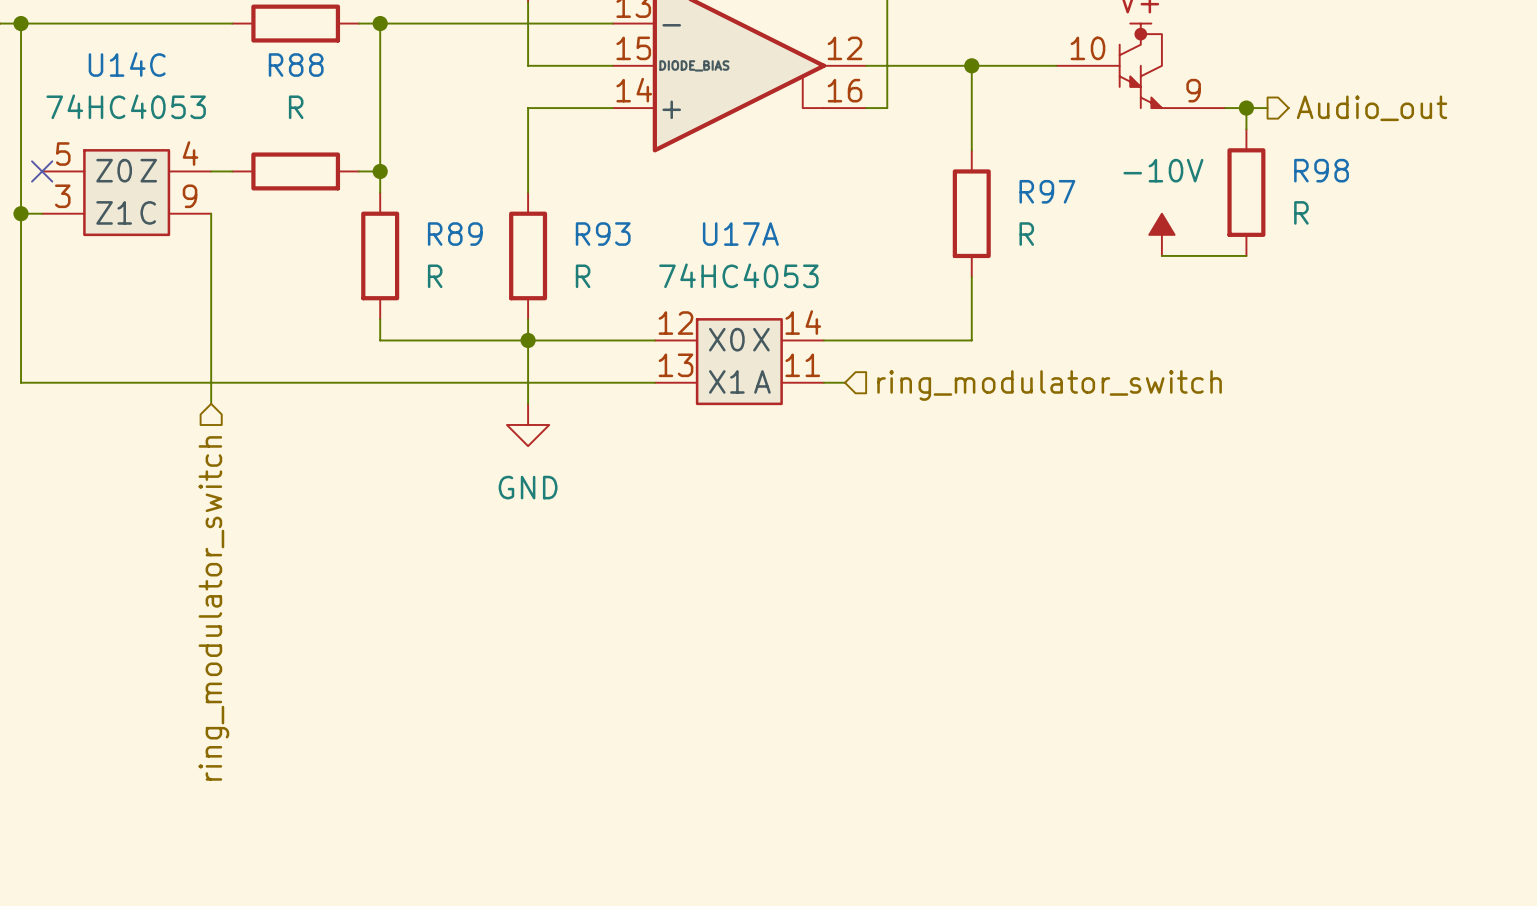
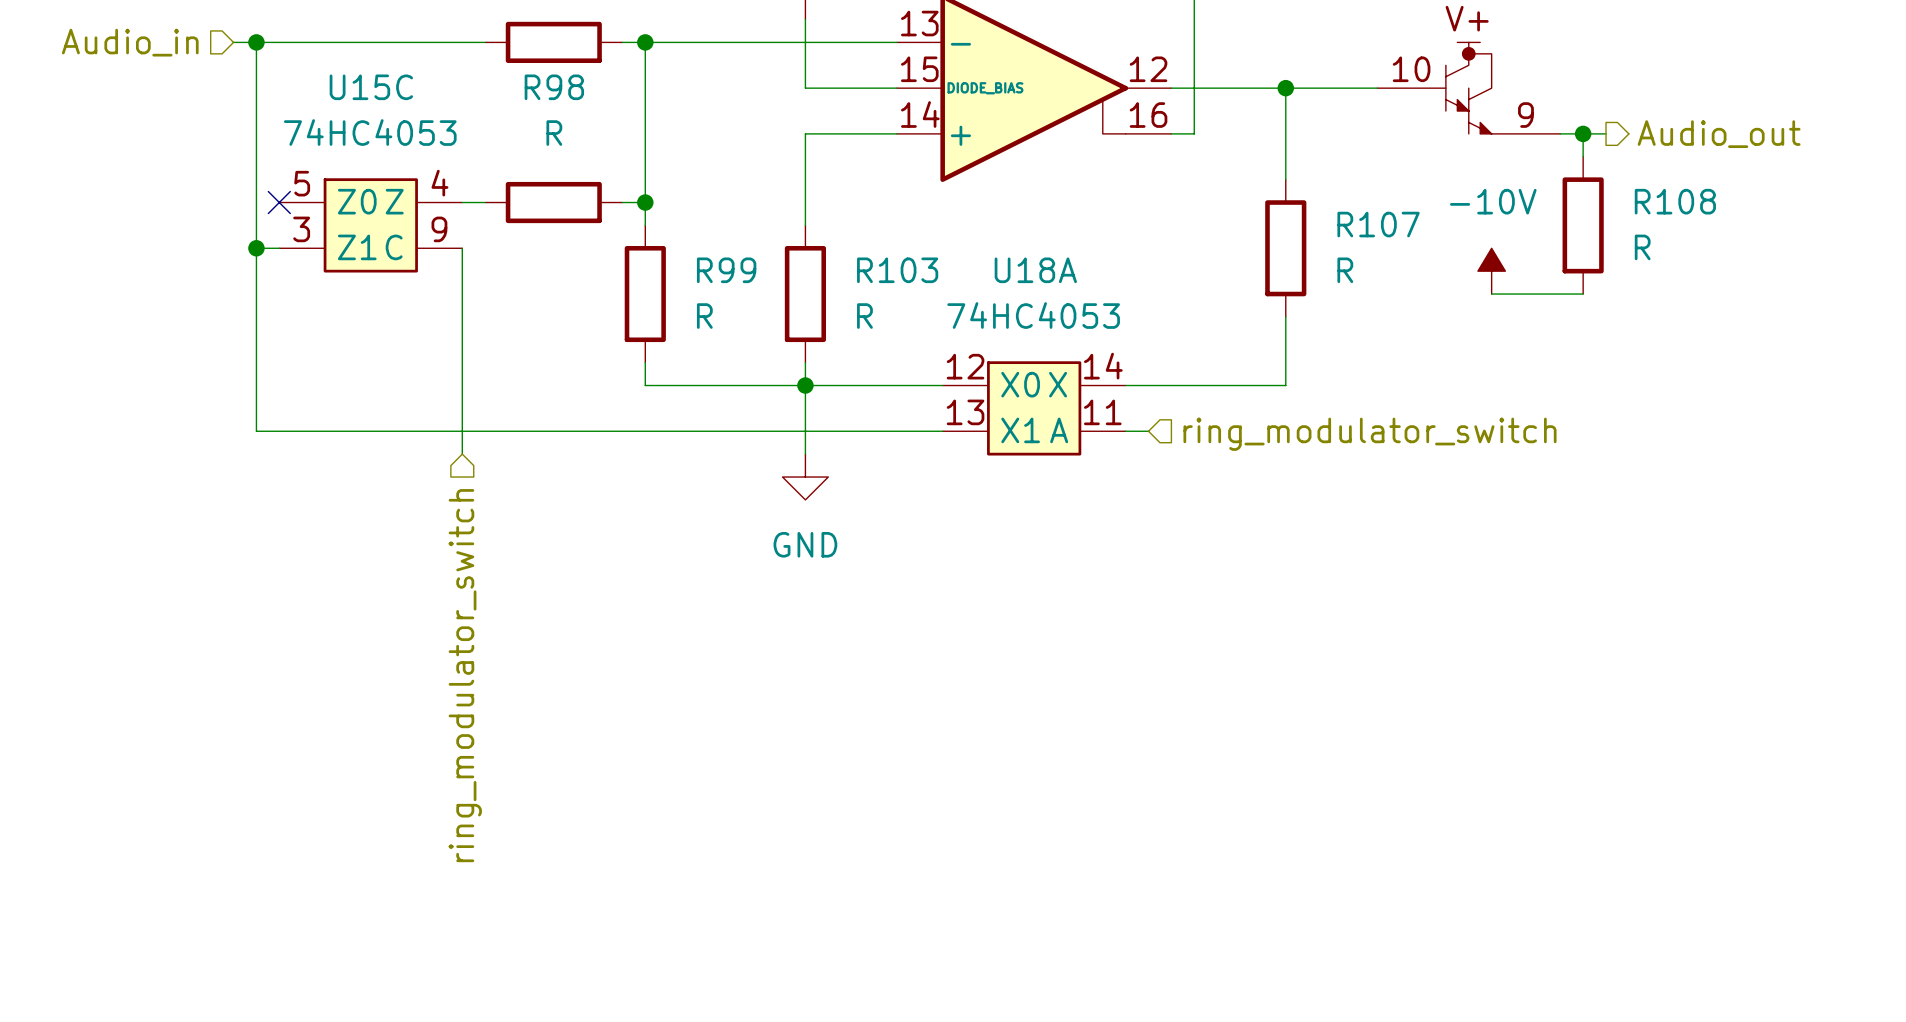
U14C name: U14C (127, 64) -> U15C (371, 87)
R88 name: R88 (296, 65) -> R98 (554, 87)
R98 name: R98 (1321, 170) -> R108 (1675, 201)
R97 name: R97 (1047, 191) -> R107 (1378, 224)
R89 name: R89 (455, 234) -> R99 (726, 270)
R93 name: R93 (603, 234) -> R103 (897, 270)
U17A name: U17A (740, 234) -> U18A (1035, 270)

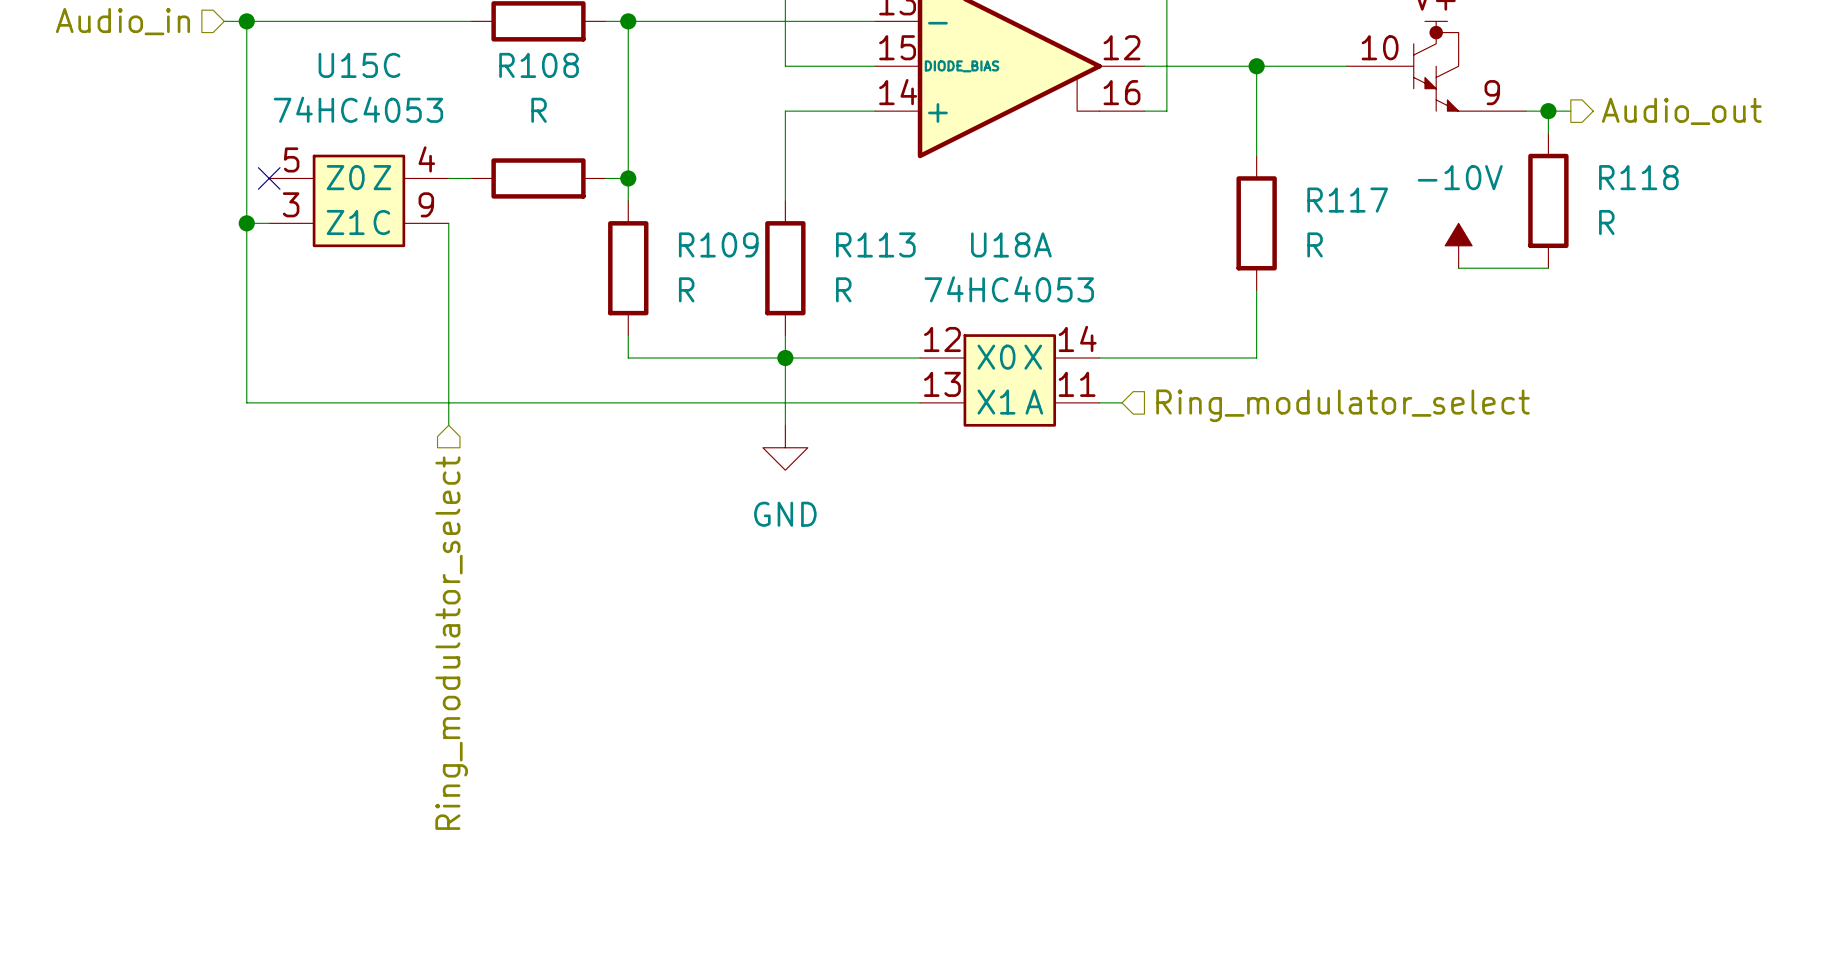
R98 name: R98 (554, 87) -> R108 (539, 65)
R108 name: R108 (1675, 201) -> R118 (1638, 177)
R107 name: R107 (1378, 224) -> R117 (1347, 200)
R99 name: R99 (726, 270) -> R109 (718, 244)
R103 name: R103 (897, 270) -> R113 (875, 244)
hierarchical label: ring_modulator_switch (1370, 434) -> Ring_modulator_select (1343, 405)
hierarchical label: ring_modulator_switch (465, 675) -> Ring_modulator_select (451, 643)

